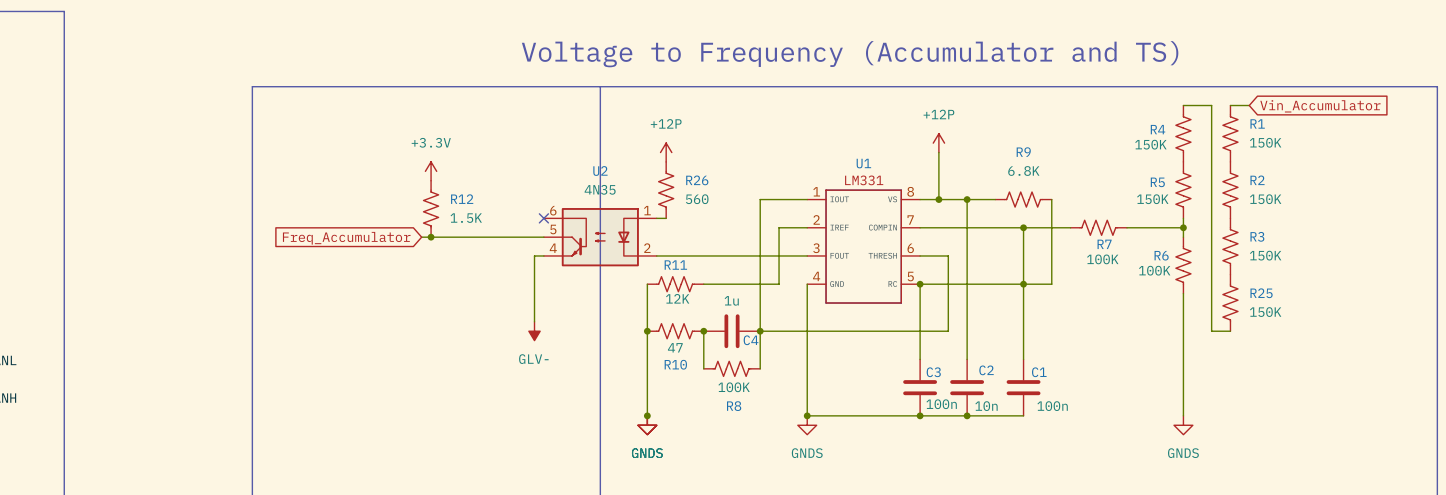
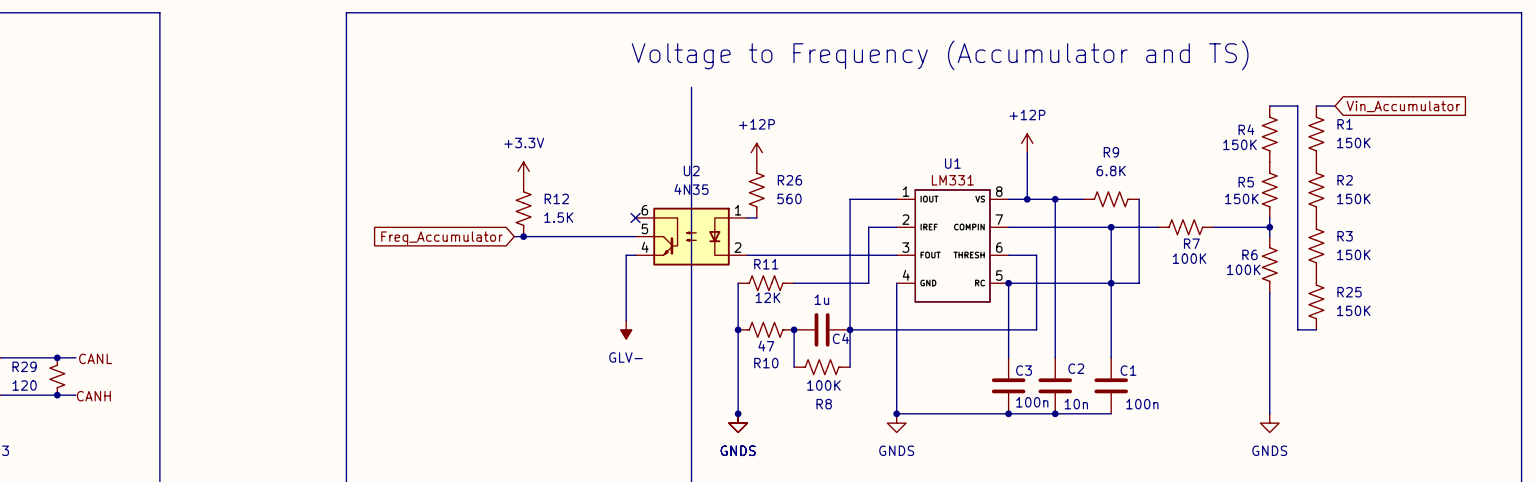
line: (252, 86) (1437, 86) -> (346, 87) (346, 12) (1521, 12) (1521, 87)

